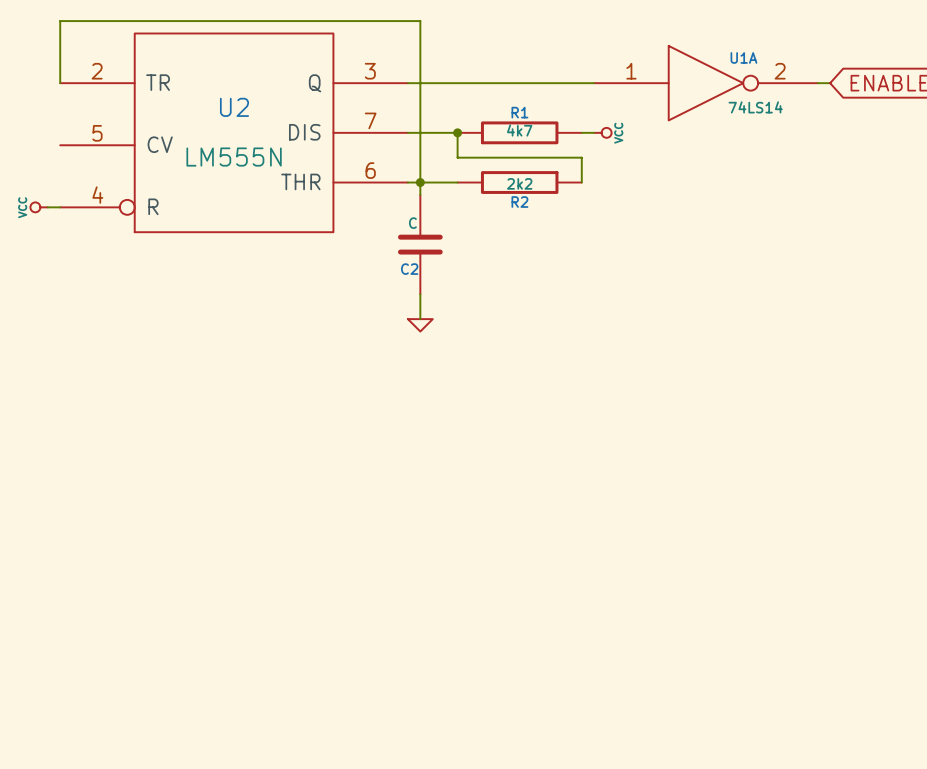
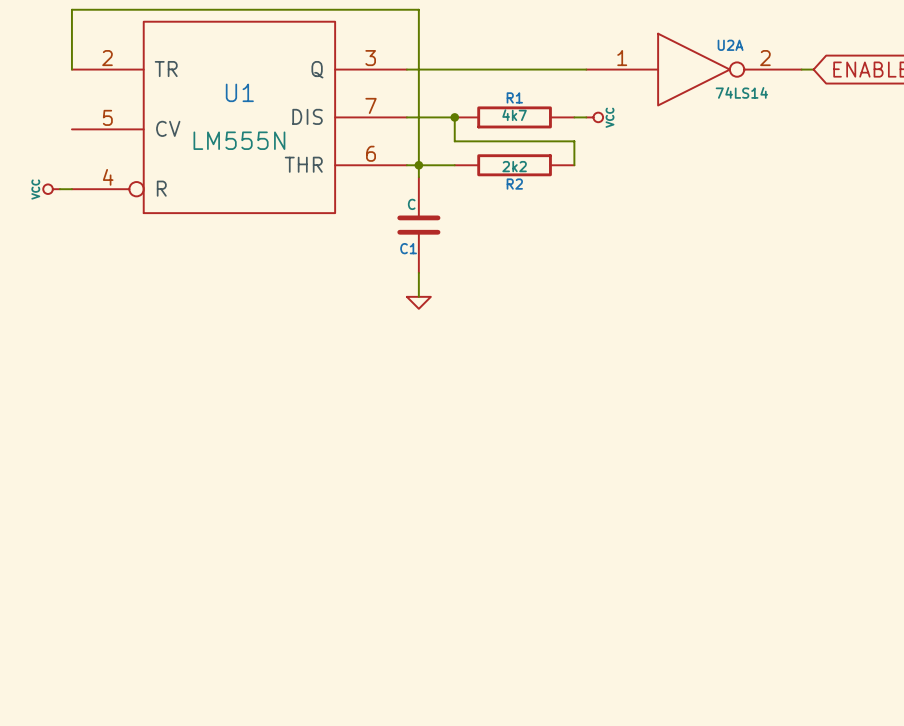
U1A name: U1A (743, 57) -> U2A (730, 45)
U2 name: U2 (234, 107) -> U1 (239, 92)
C2 name: C2 (409, 269) -> C1 (408, 248)

